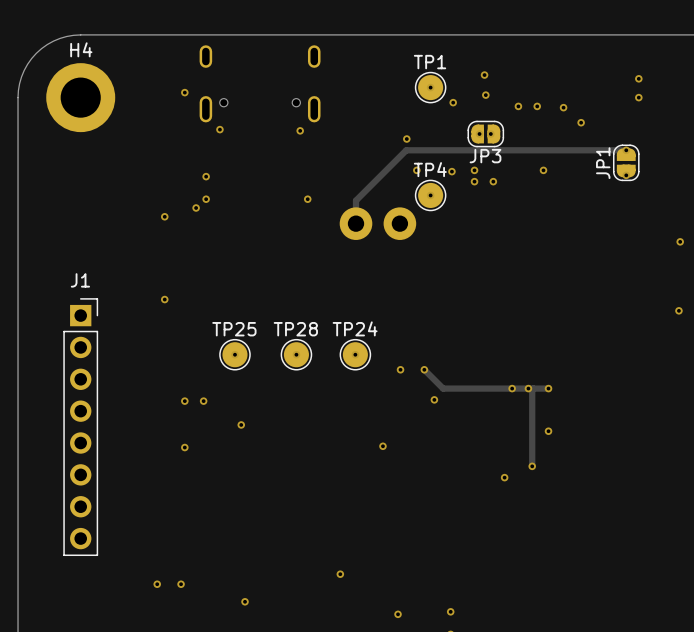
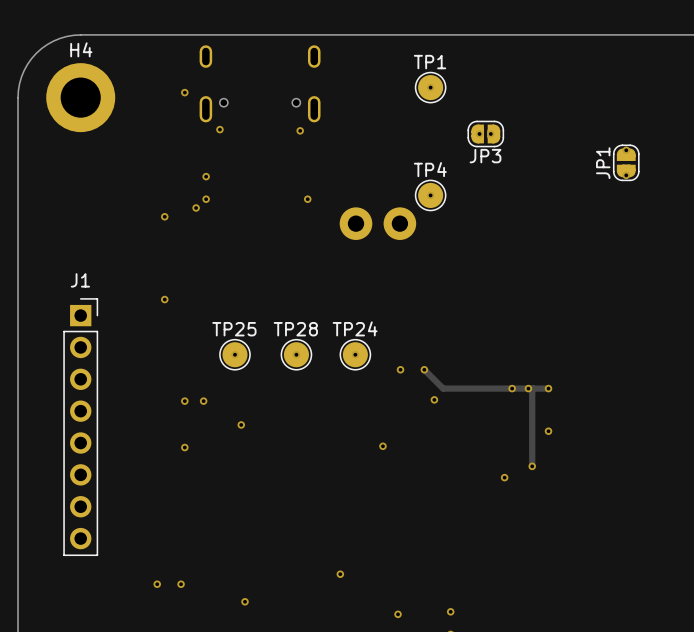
via: (484, 75) -> none
via: (638, 78) -> none
via: (485, 95) -> none
via: (638, 97) -> none
via: (453, 102) -> none
via: (518, 106) -> none
via: (537, 106) -> none
via: (563, 107) -> none
via: (581, 122) -> none
via: (406, 139) -> none
track: (626, 150) (406, 150) (356, 200) (356, 223) -> none
via: (416, 170) -> none
via: (474, 170) -> none
via: (543, 170) -> none
via: (451, 171) -> none
via: (474, 181) -> none
via: (493, 181) -> none
via: (680, 241) -> none
via: (678, 310) -> none

